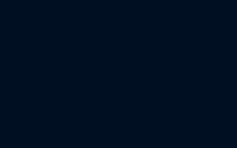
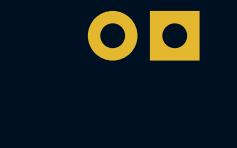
part: none -> (143, 35)

